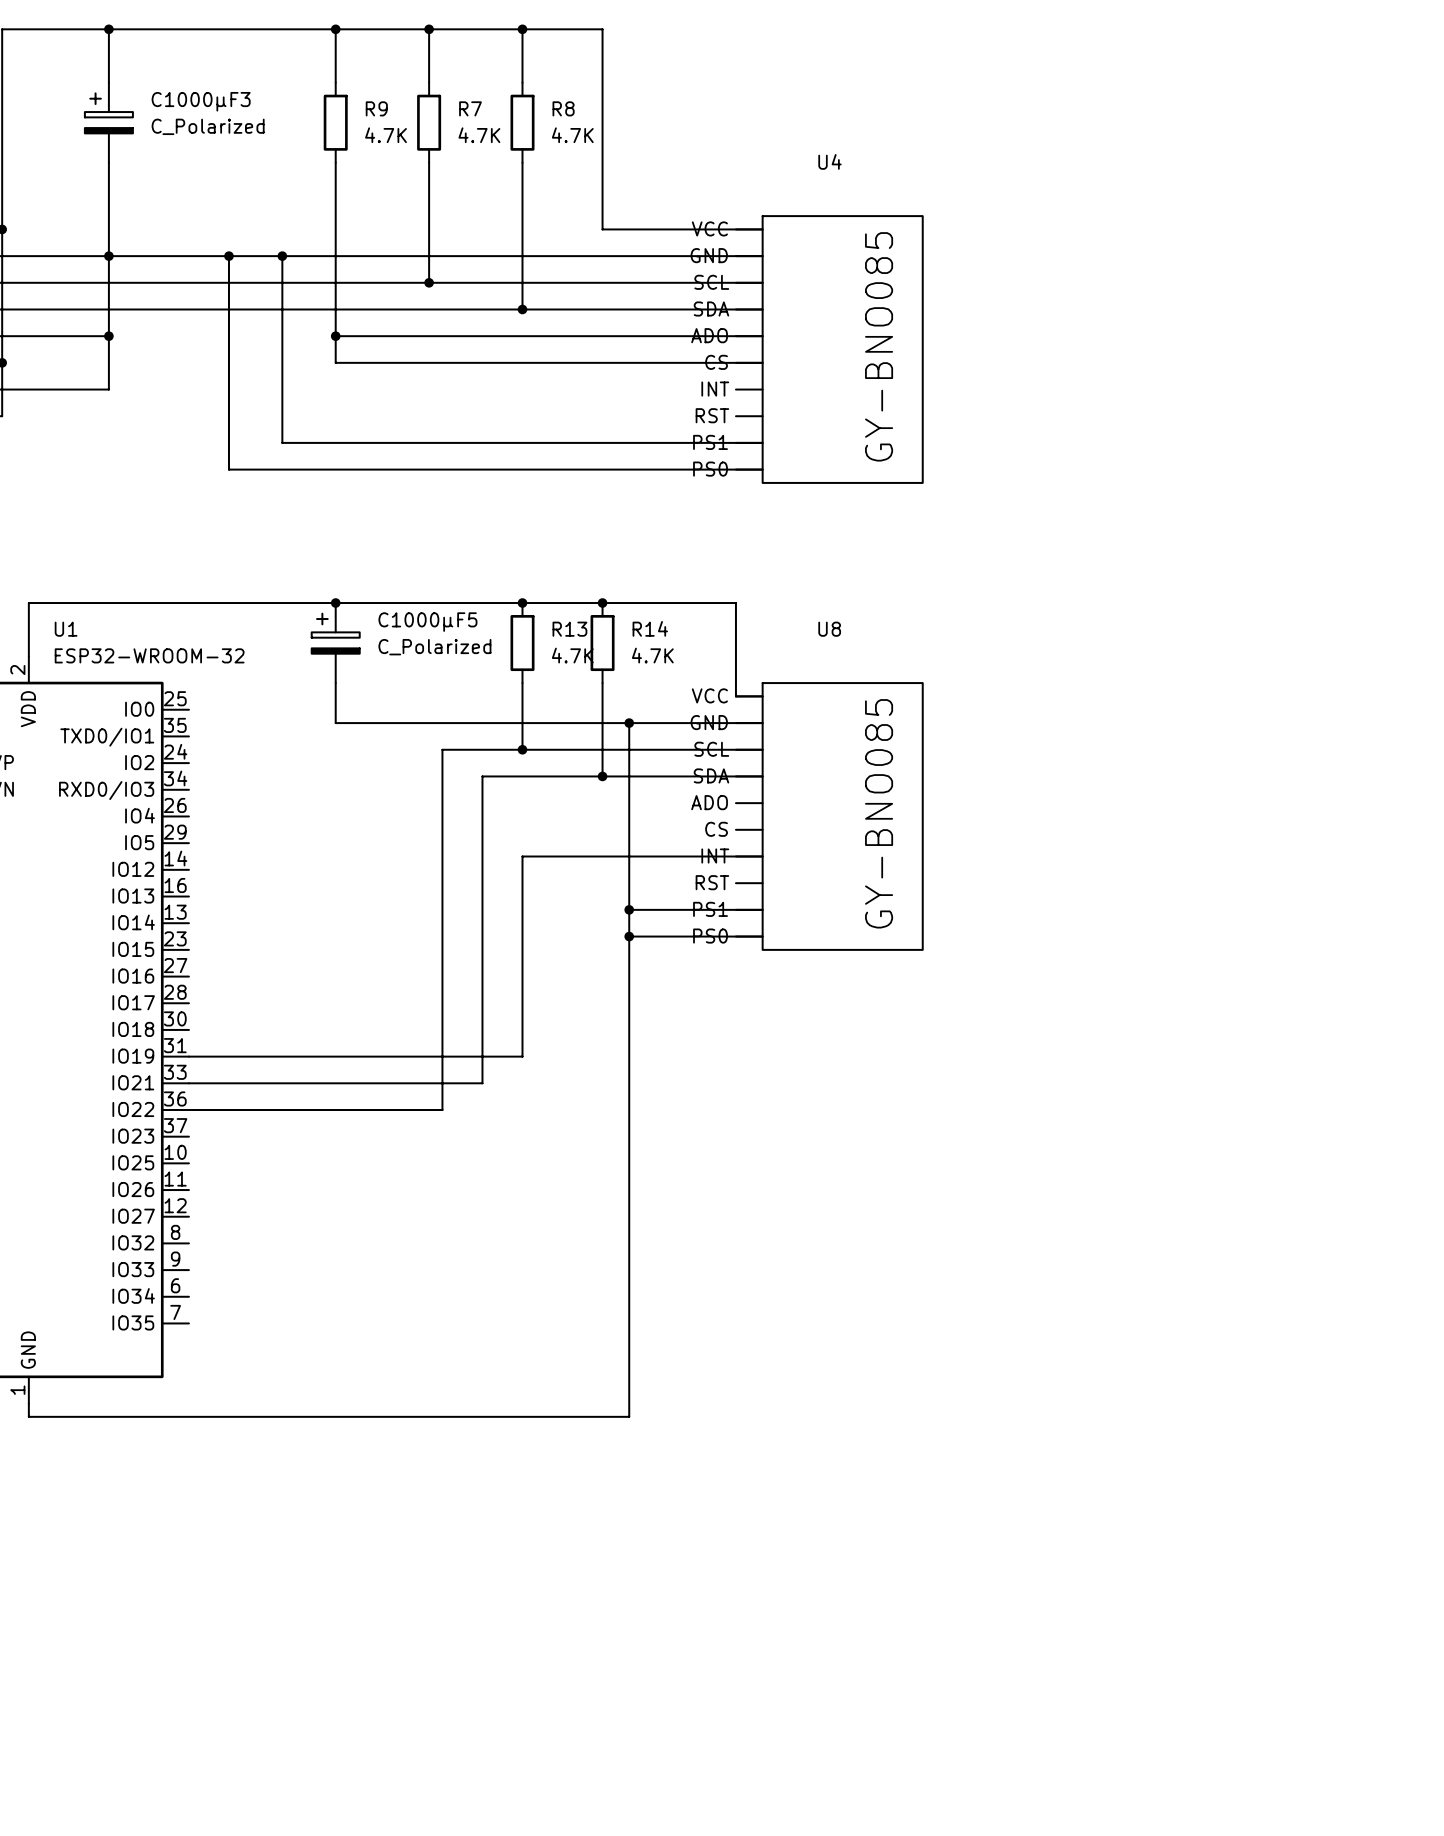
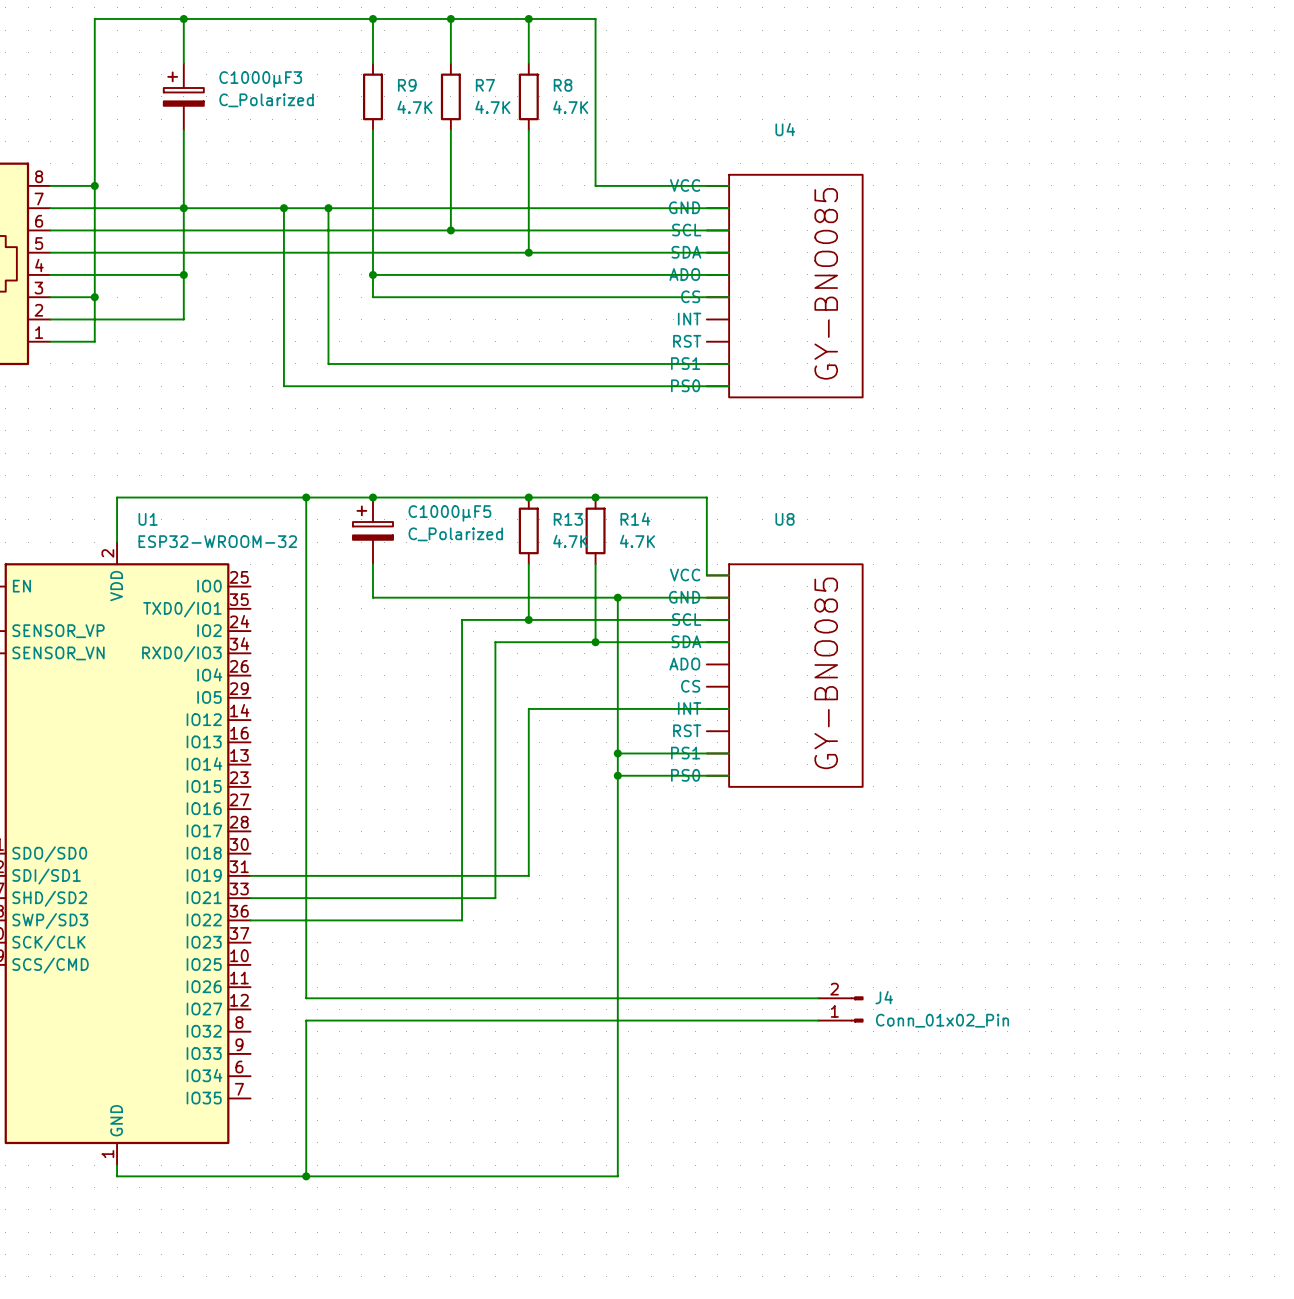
wire: none -> (306, 497) (306, 998) (818, 998)
junction: none -> (306, 497)
J4: none -> Conn_01x02_Pin (840, 1009)
wire: none -> (818, 1020) (306, 1020) (306, 1176)
junction: none -> (306, 1176)

